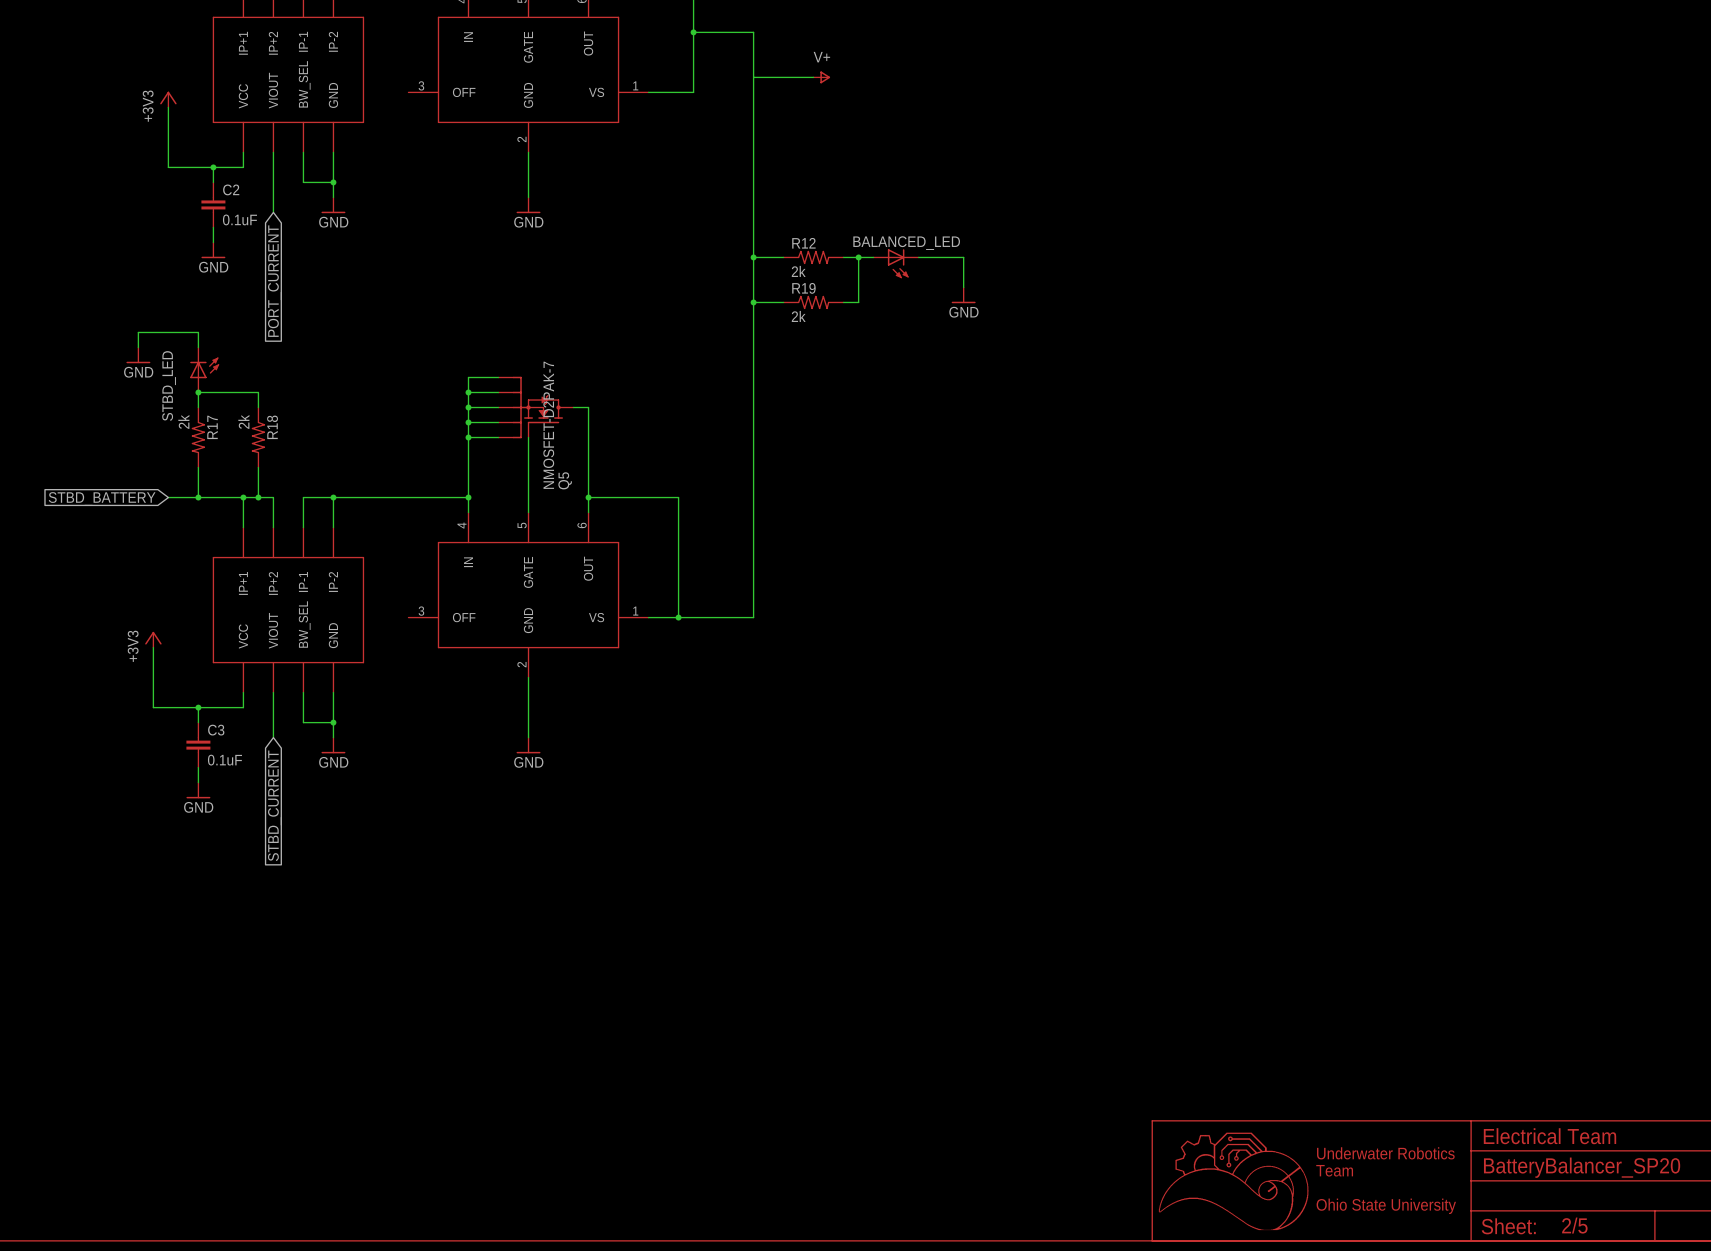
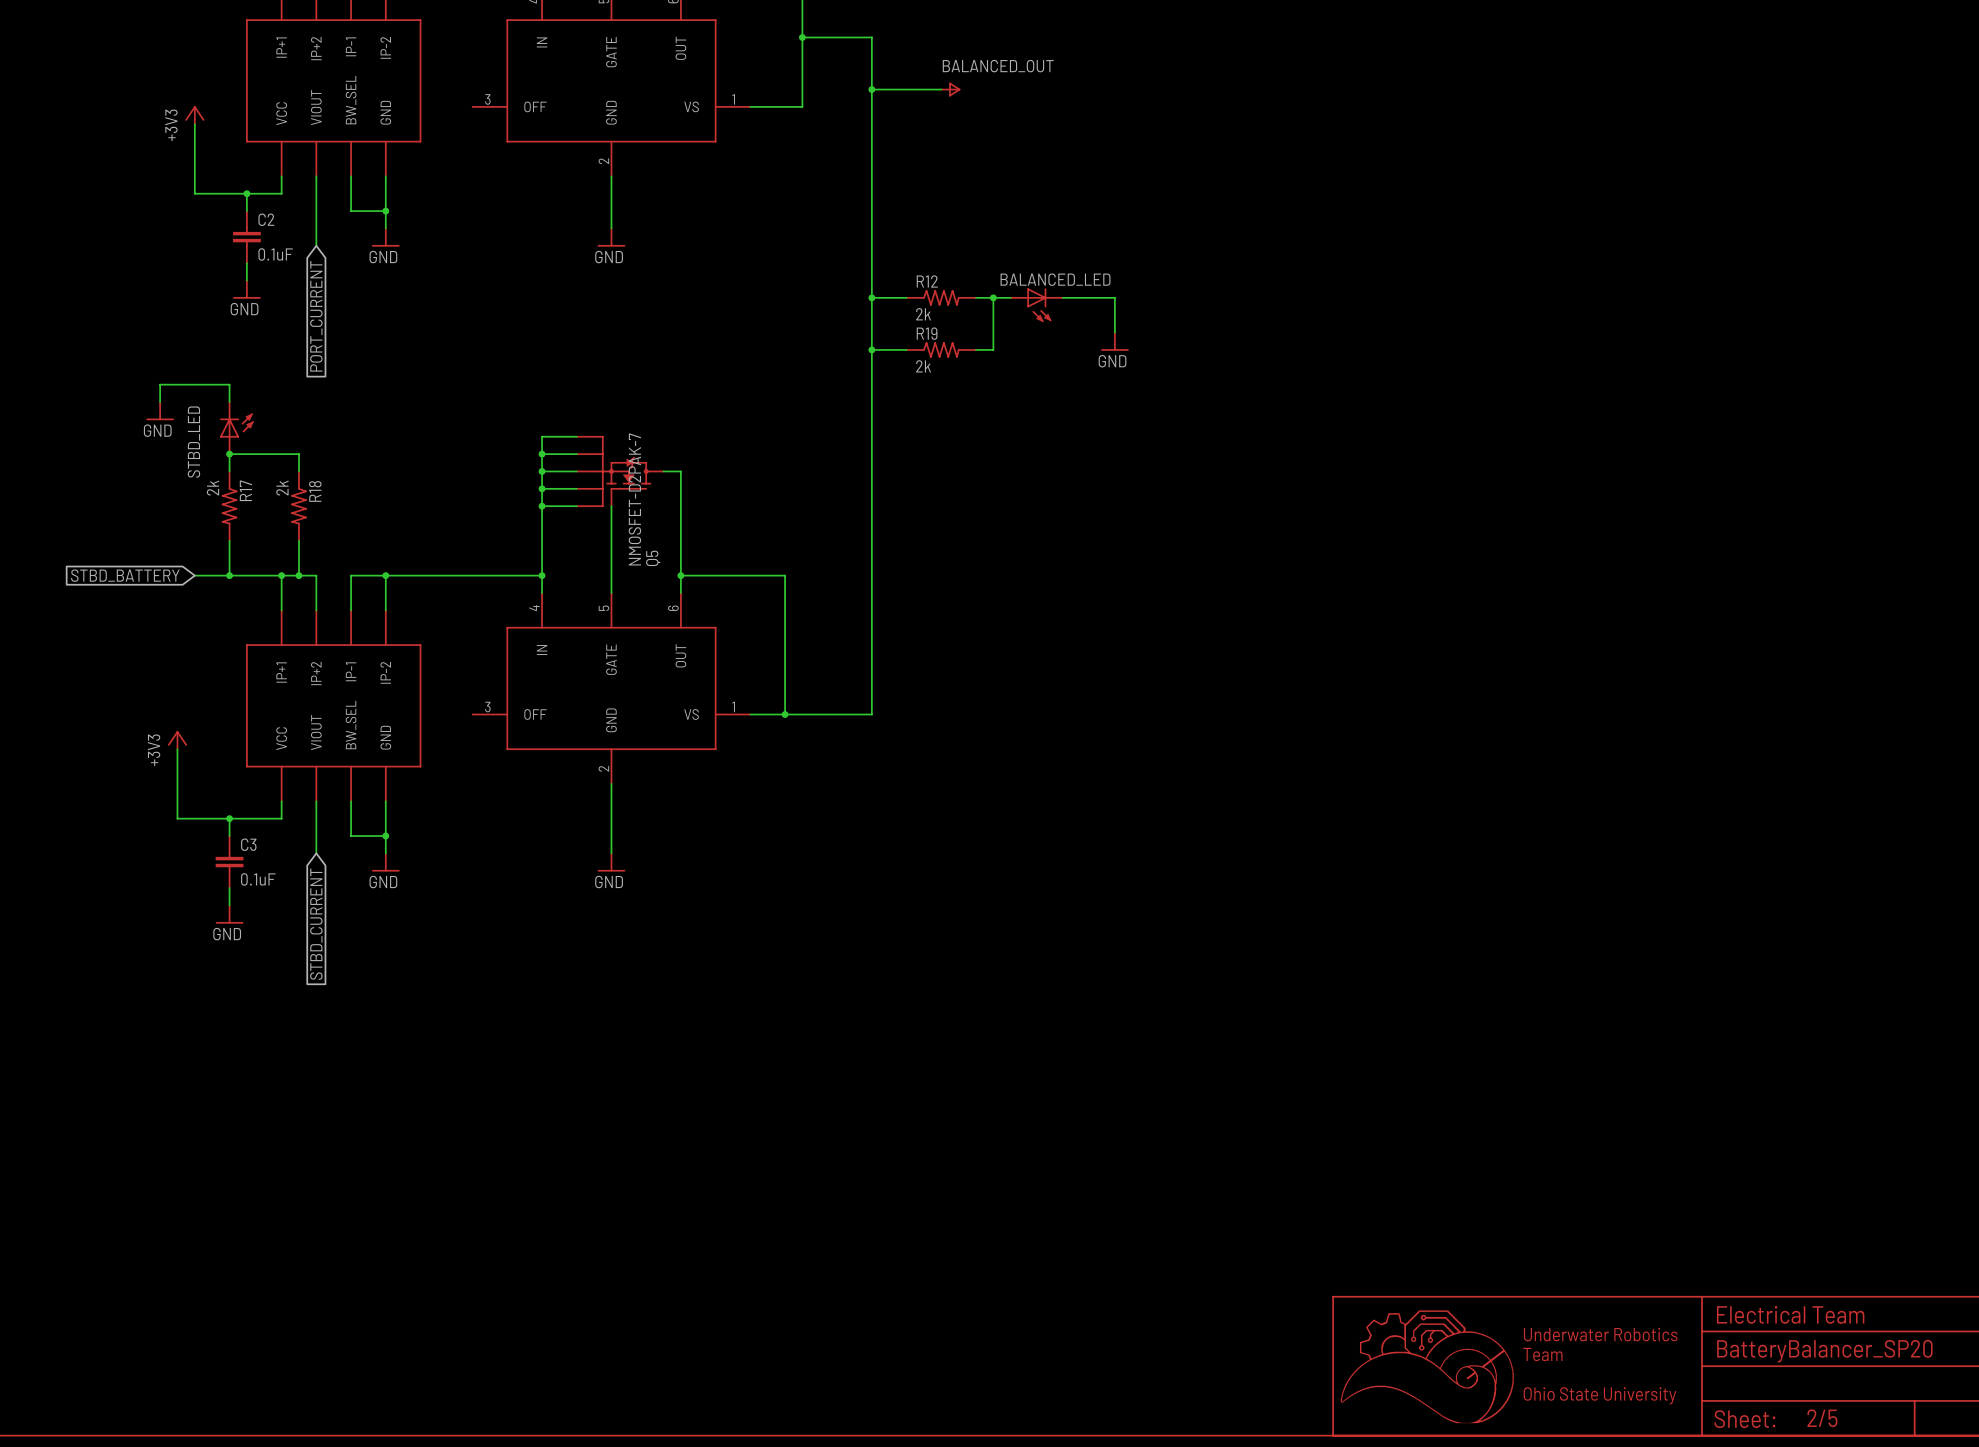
power symbol text: V+ (821, 57) -> none
label: none -> BALANCED_OUT (998, 66)
junction: none -> (871, 89)

